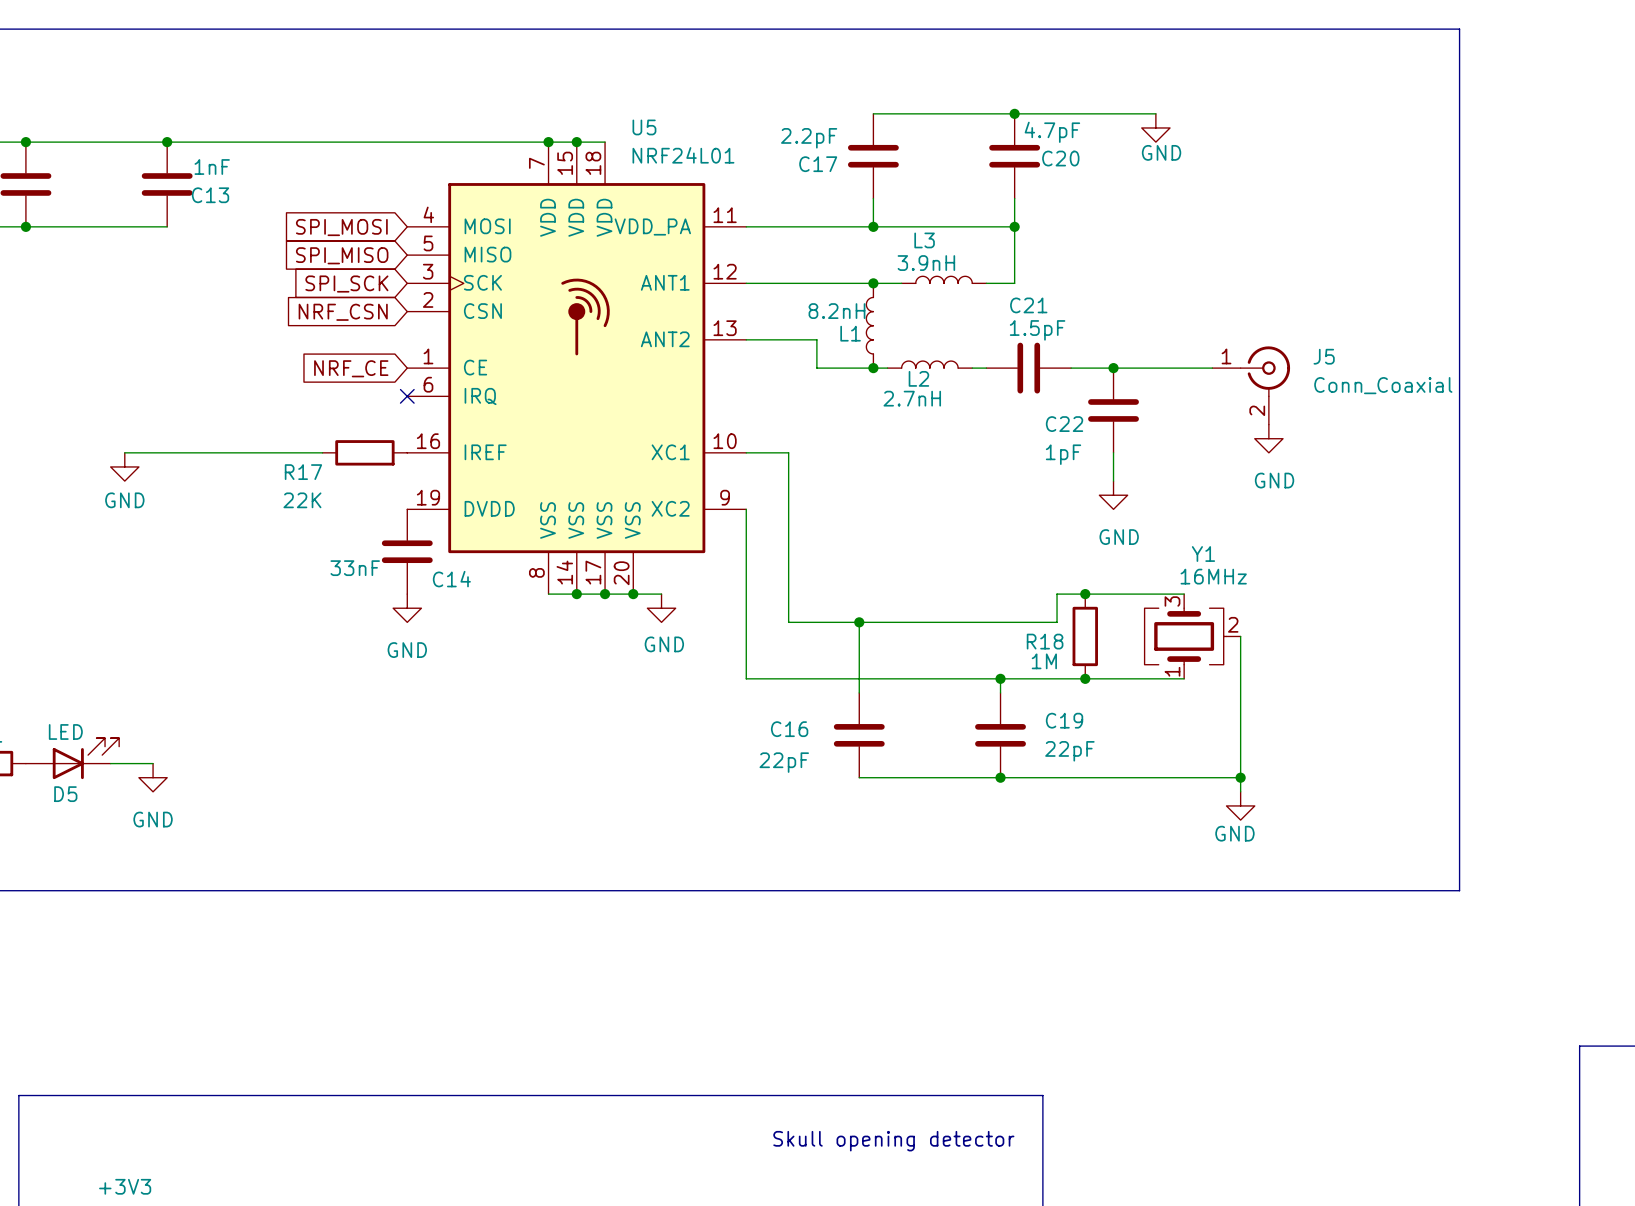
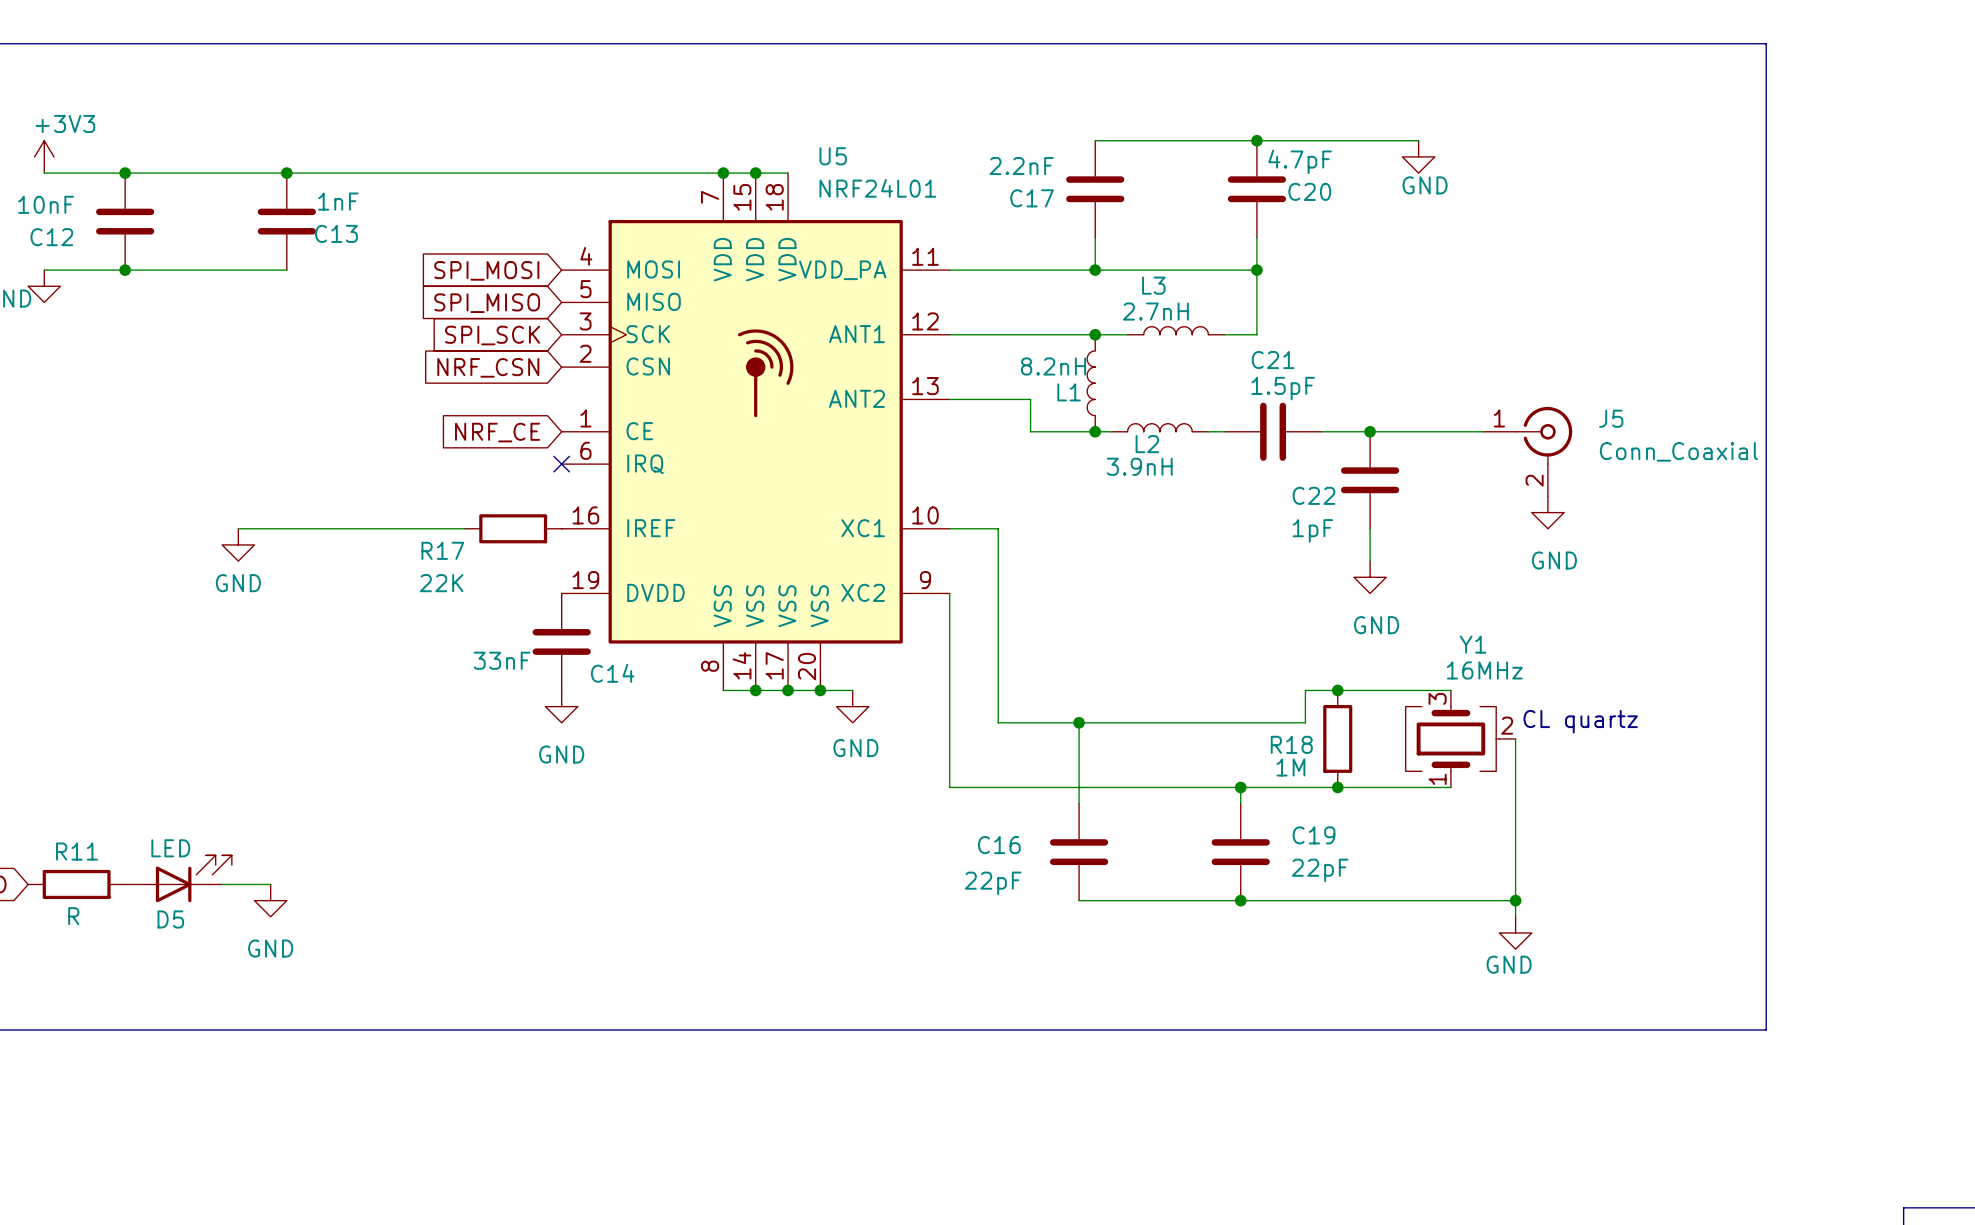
C17 value: 2.2pF (809, 138) -> 2.2nF (1021, 166)
L3 value: 3.9nH (926, 263) -> 2.7nH (1155, 311)
L2 value: 2.7nH (912, 398) -> 3.9nH (1139, 466)
text: none -> CL quartz (1580, 721)

